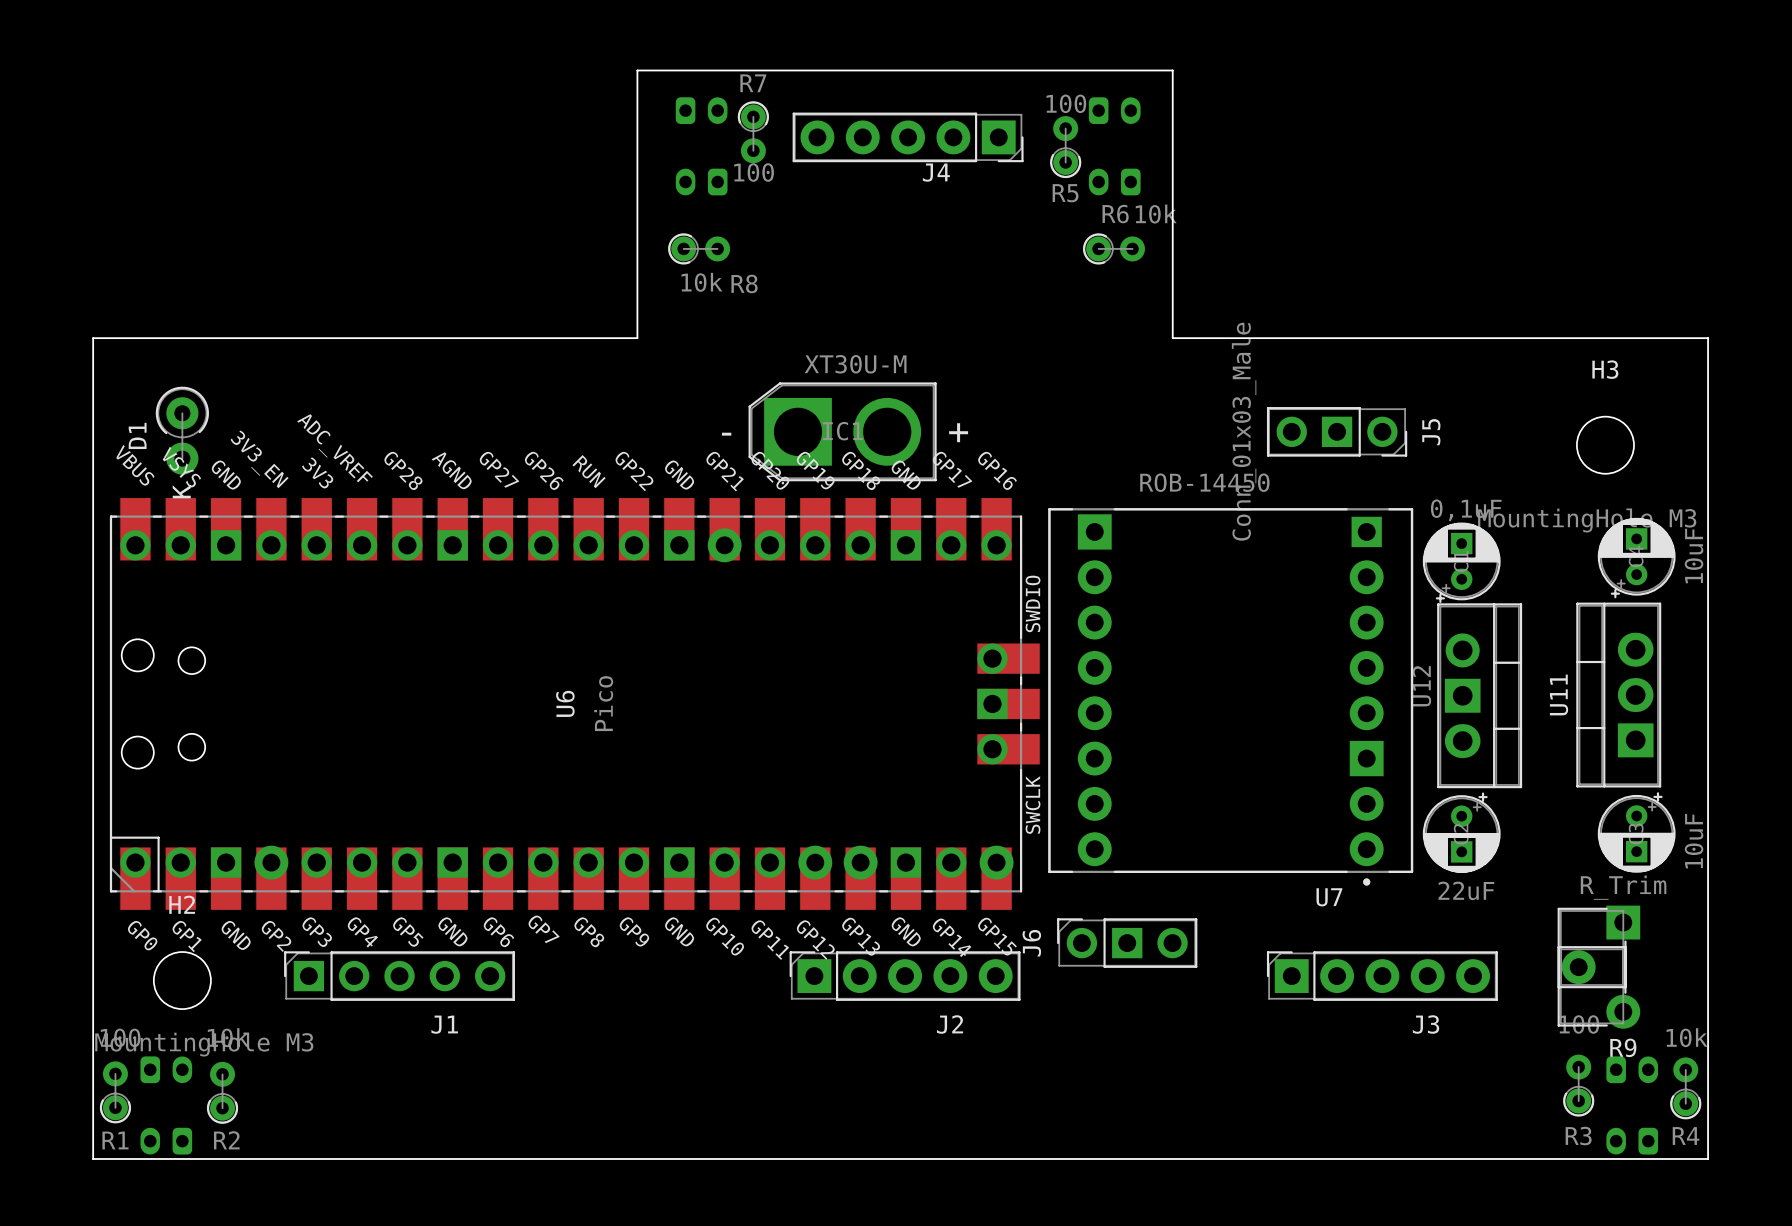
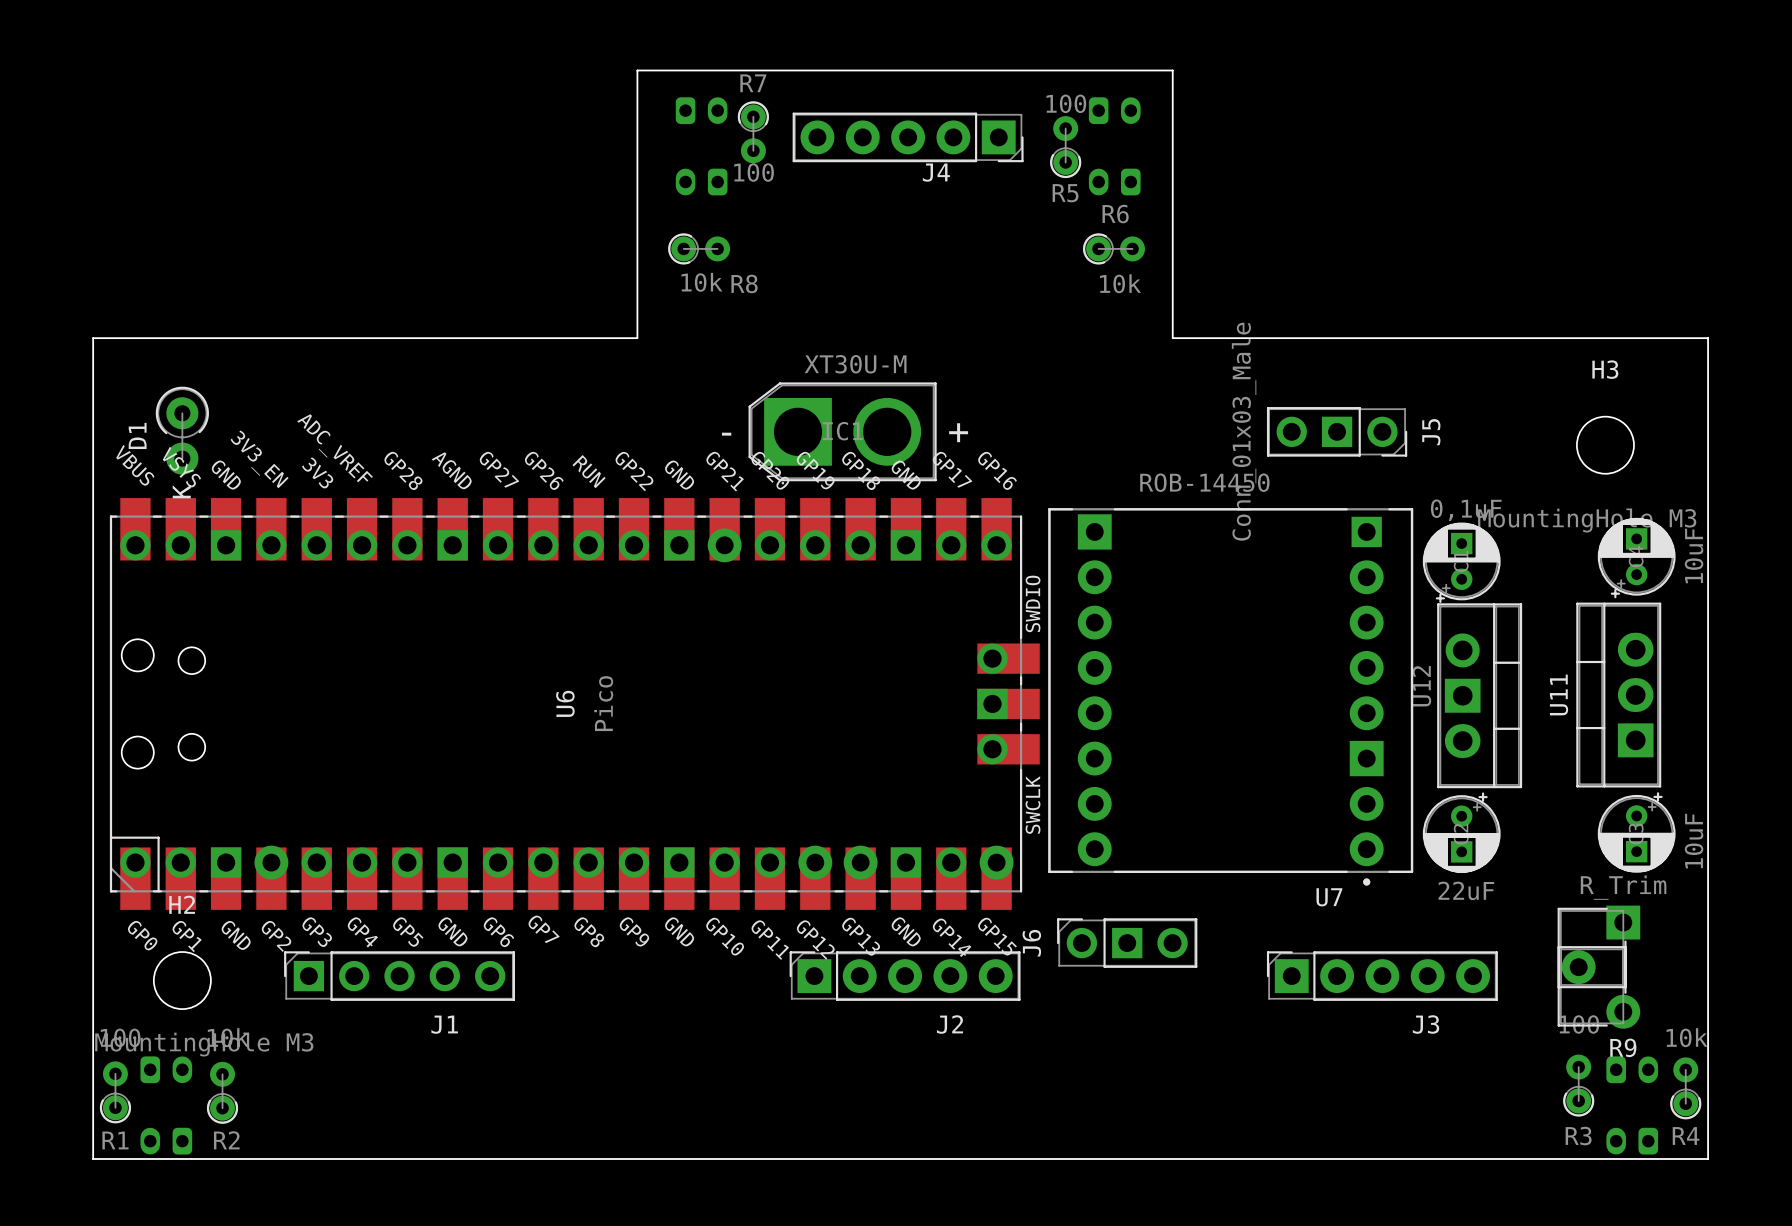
R6 value position: 10k (1156, 214) -> 10k (1120, 283)

